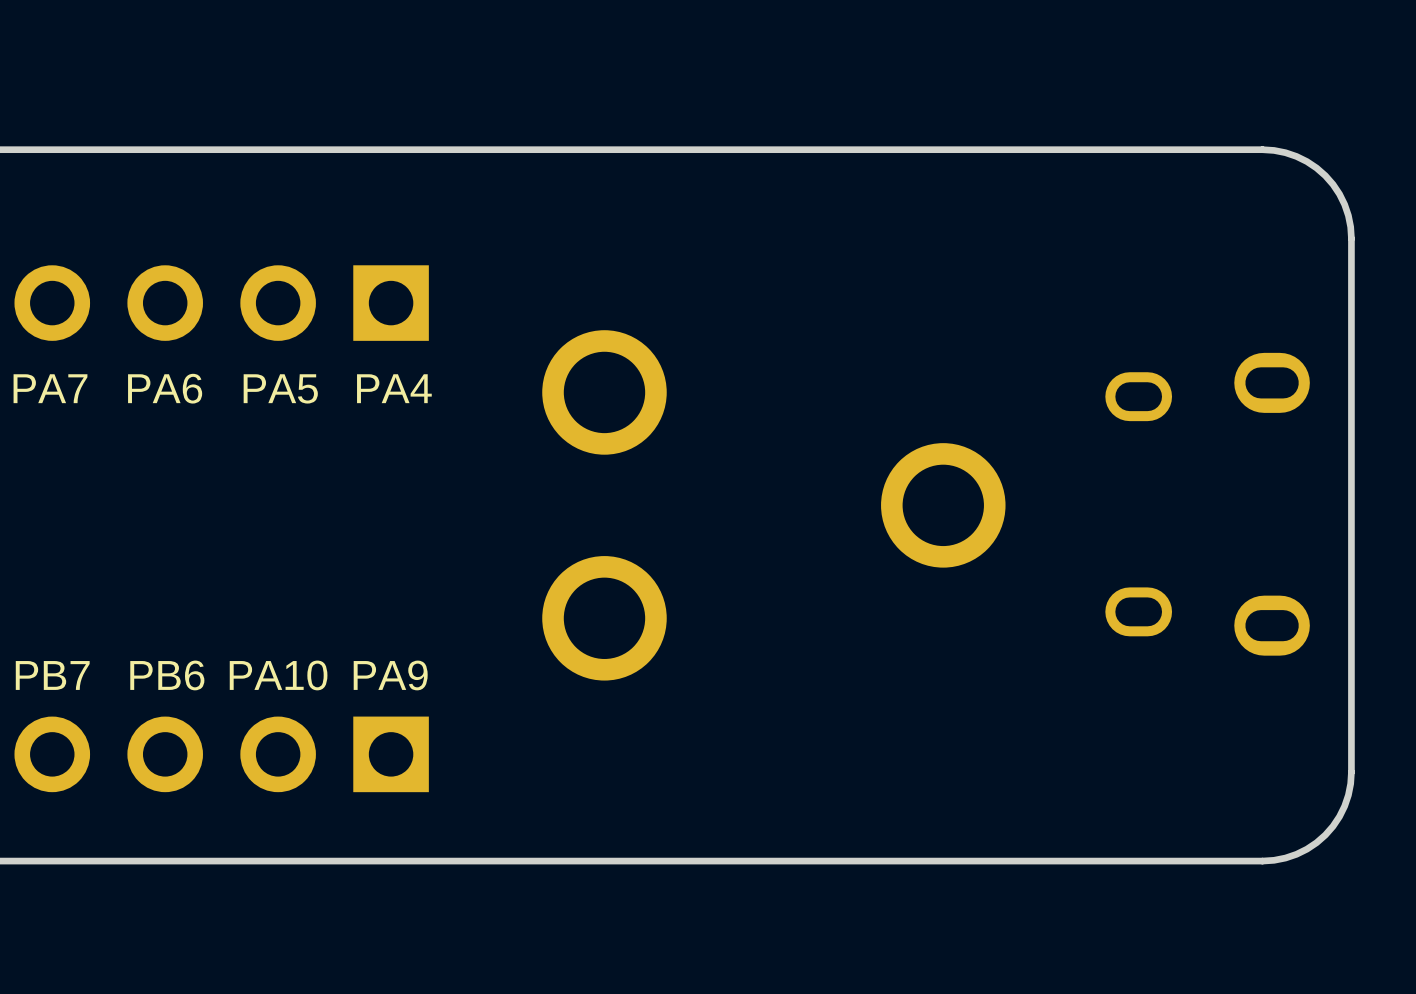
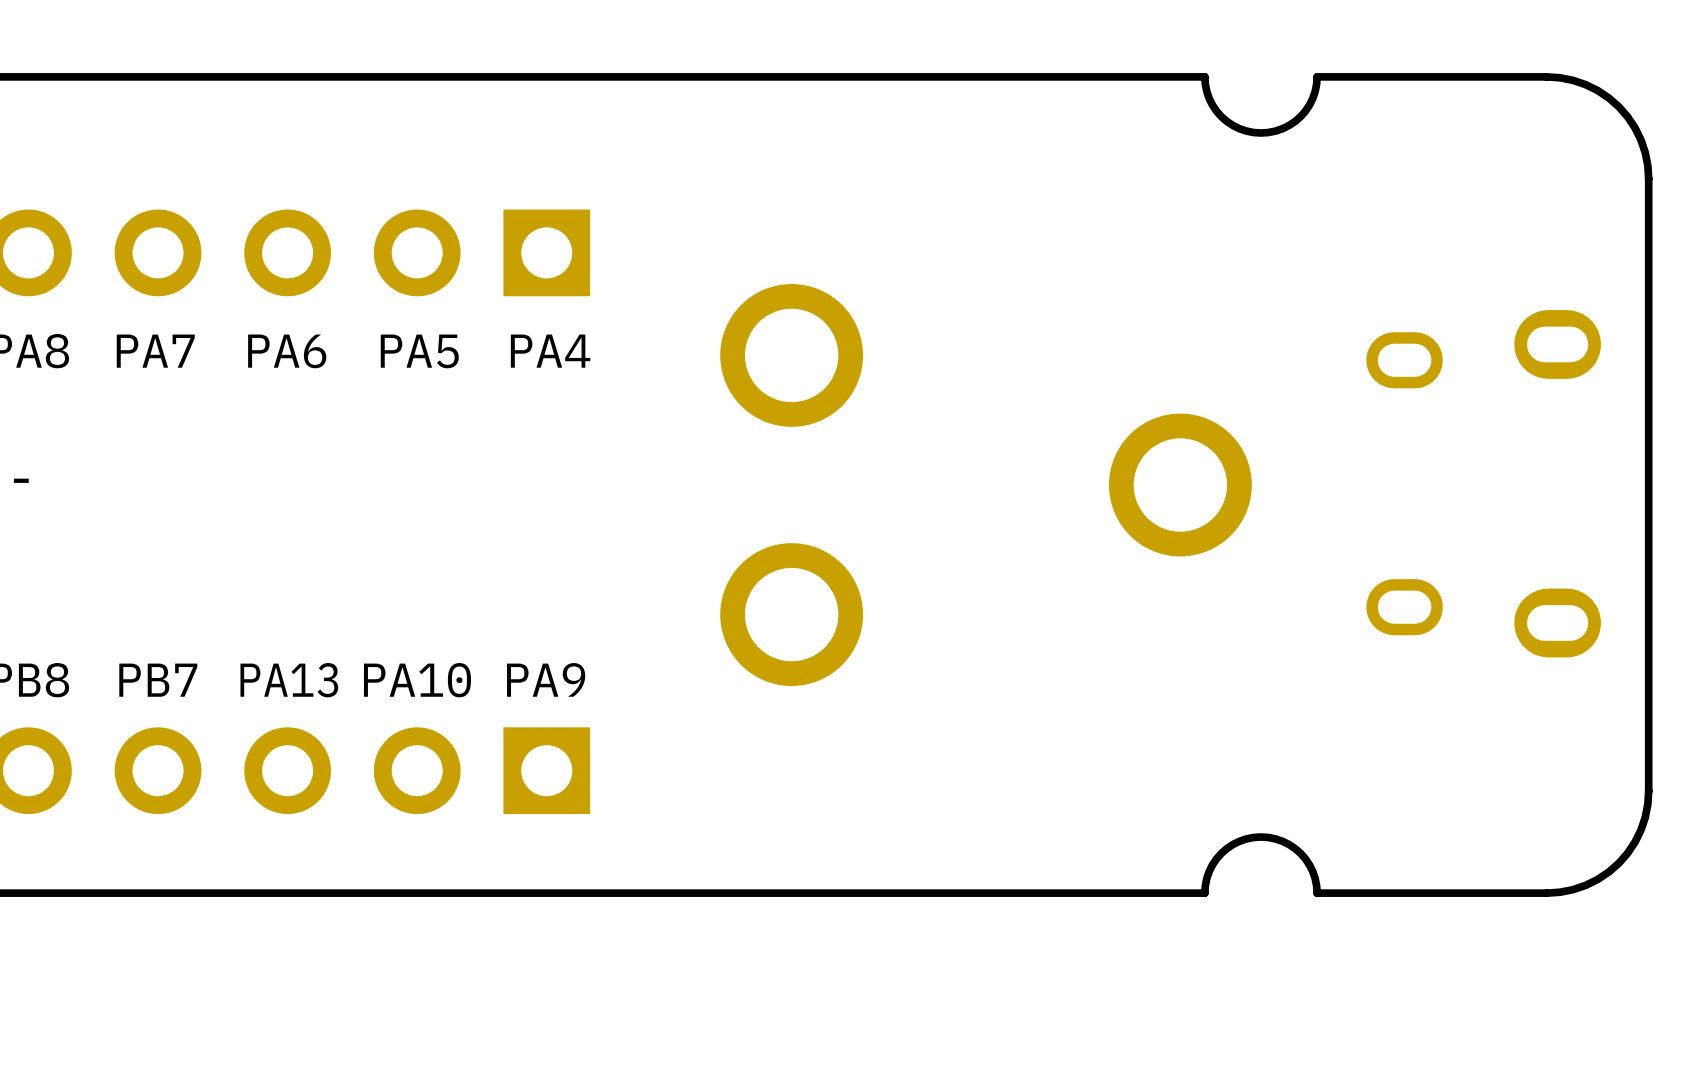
board edge: (1062, 149) (964, 149) -> (1317, 76) (1312, 98) (1300, 116) (1282, 128) (1260, 133) (1239, 128) (1221, 116) (1209, 98) (1204, 76)
text: PB6 (167, 675) -> PA13 (289, 680)
board edge: (1062, 861) (964, 861) -> (1317, 893) (1312, 871) (1300, 853) (1282, 841) (1260, 837) (1239, 841) (1221, 853) (1209, 871) (1204, 893)

